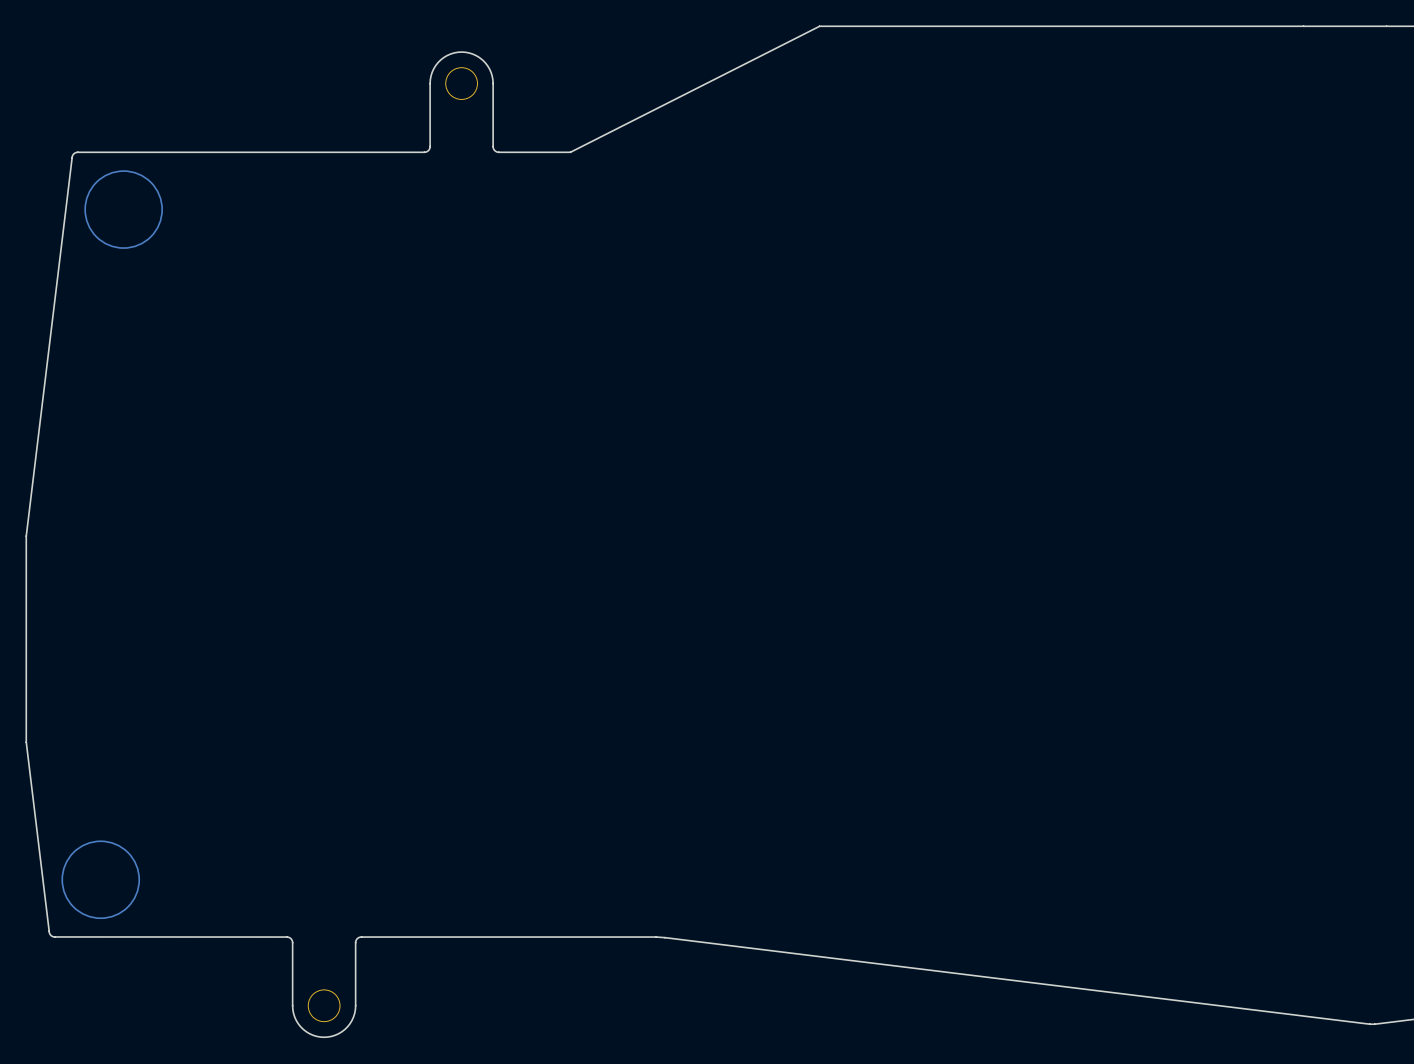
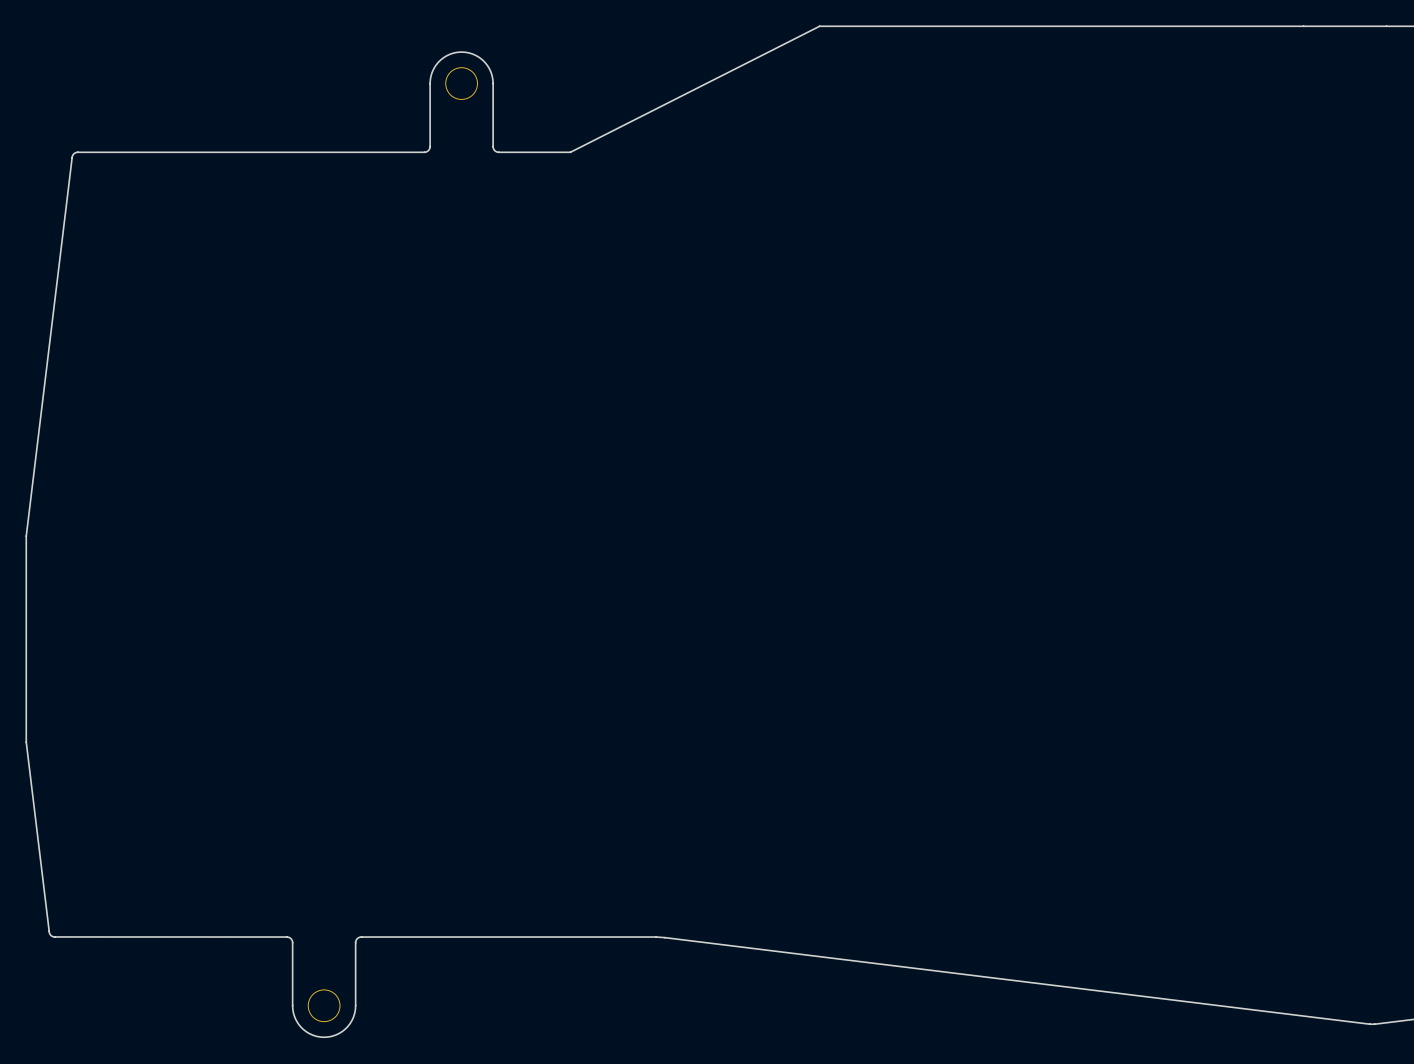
drawing: [84, 170, 163, 249] -> none
drawing: [61, 840, 140, 919] -> none

